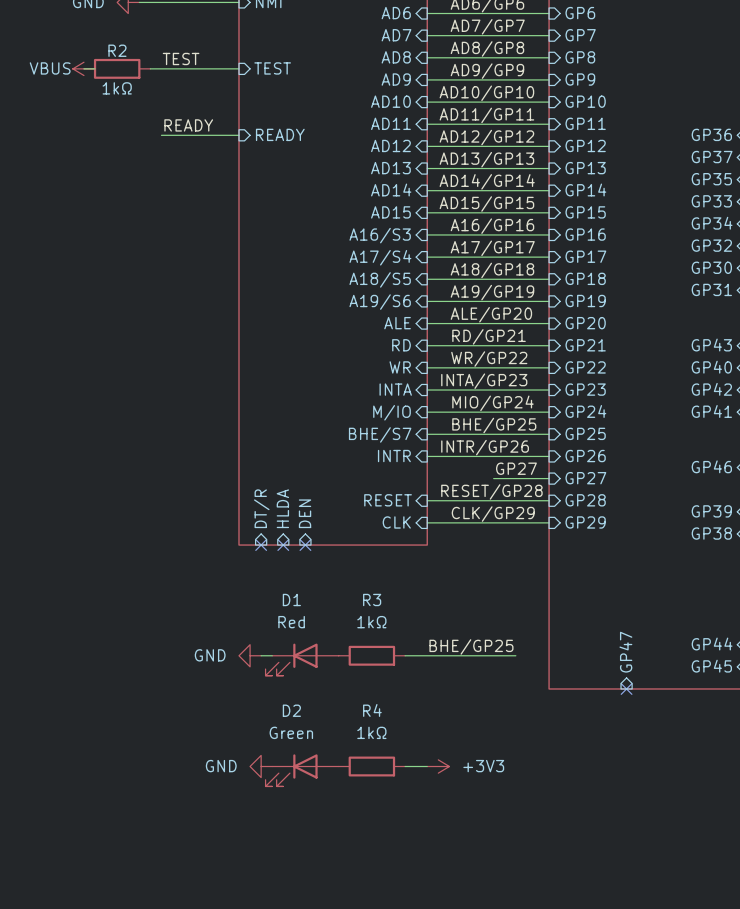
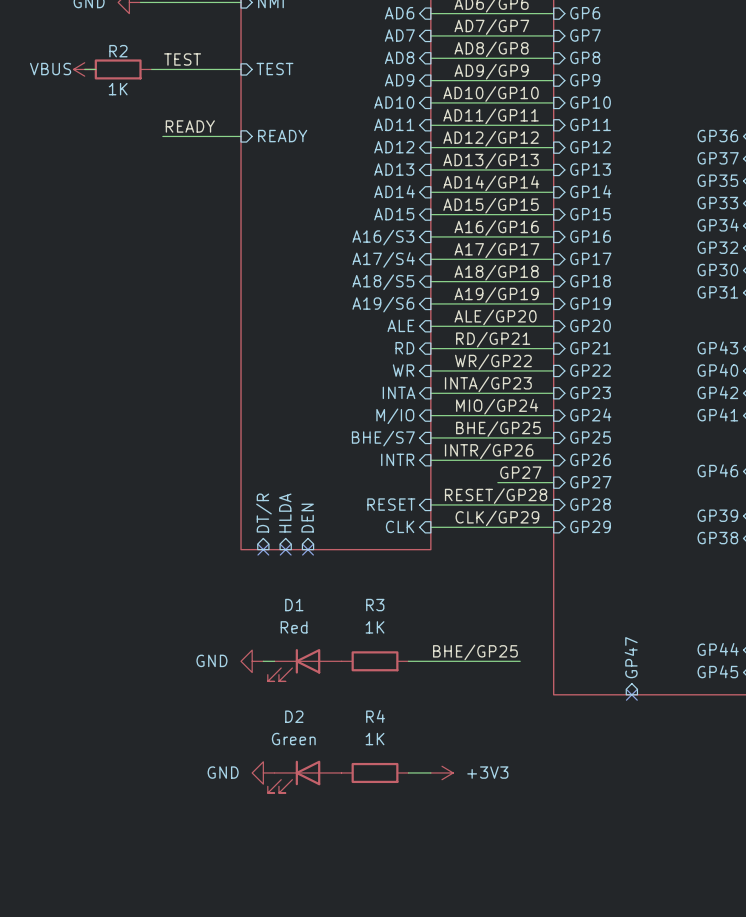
R2 value: 1kΩ (117, 88) -> 1K (118, 89)
R3 value: 1kΩ (371, 622) -> 1K (375, 627)
R4 value: 1kΩ (371, 732) -> 1K (375, 739)

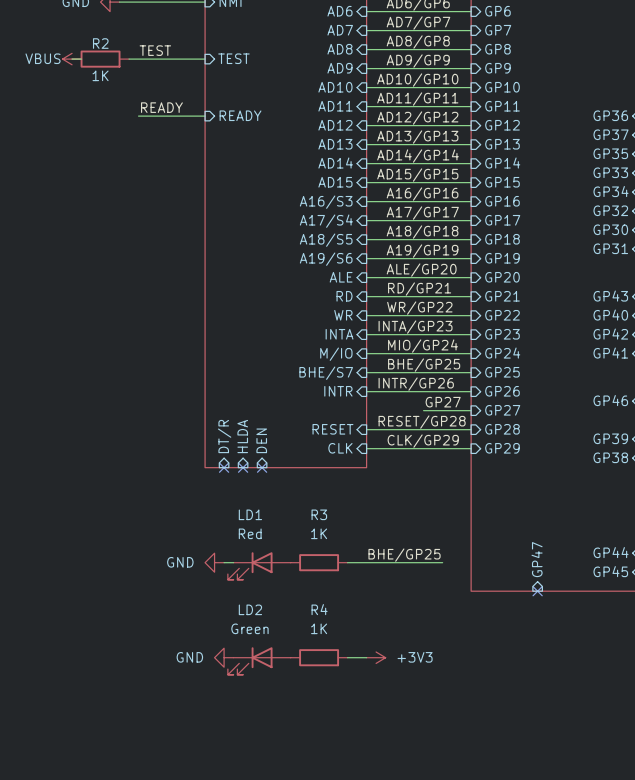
D1 name: D1 (294, 605) -> LD1 (250, 514)
D2 name: D2 (294, 716) -> LD2 (250, 609)

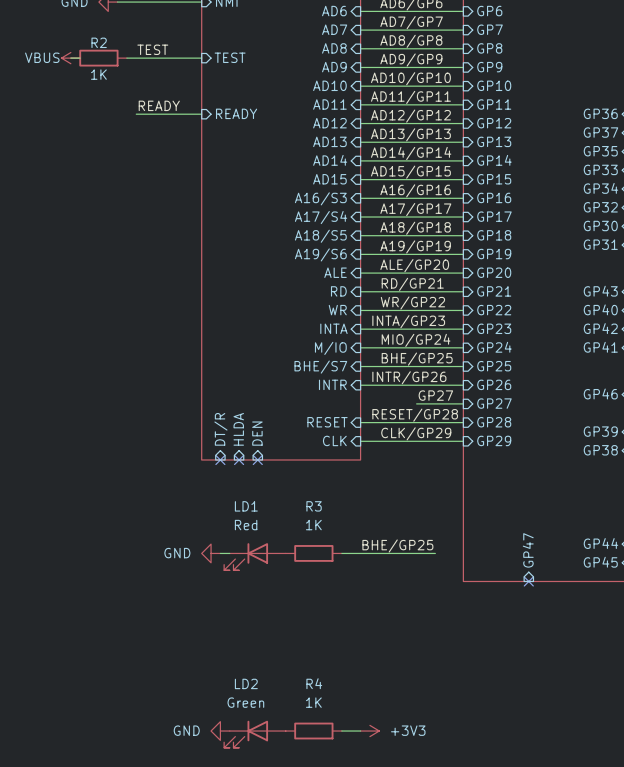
power symbol position: GND (224, 657) -> GND (220, 731)
R4 position: (319, 657) -> (313, 731)
wire: (347, 657) (366, 657) -> (341, 731) (360, 731)
power symbol position: +3V3 (376, 657) -> +3V3 (369, 731)
LD2 position: (259, 661) -> (254, 734)

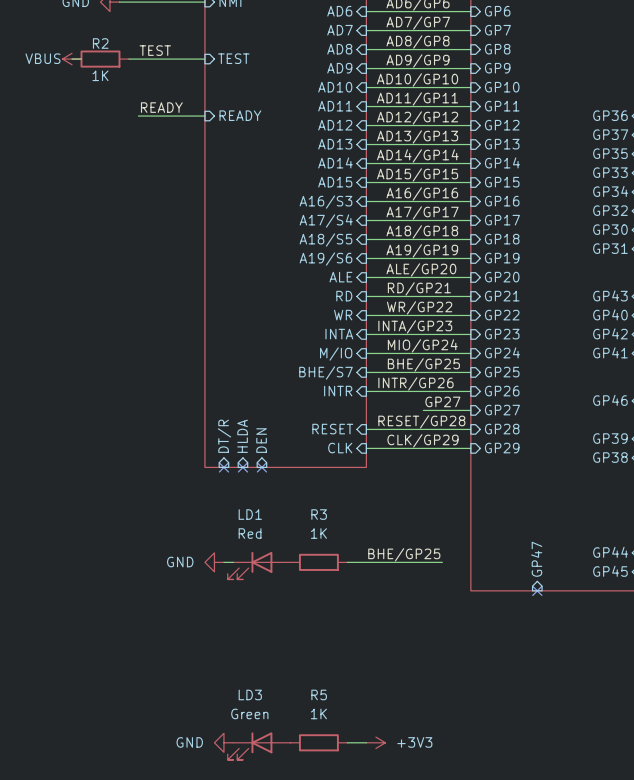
LD2 name: LD2 (246, 683) -> LD3 (250, 694)
R4 name: R4 (314, 683) -> R5 (319, 694)

